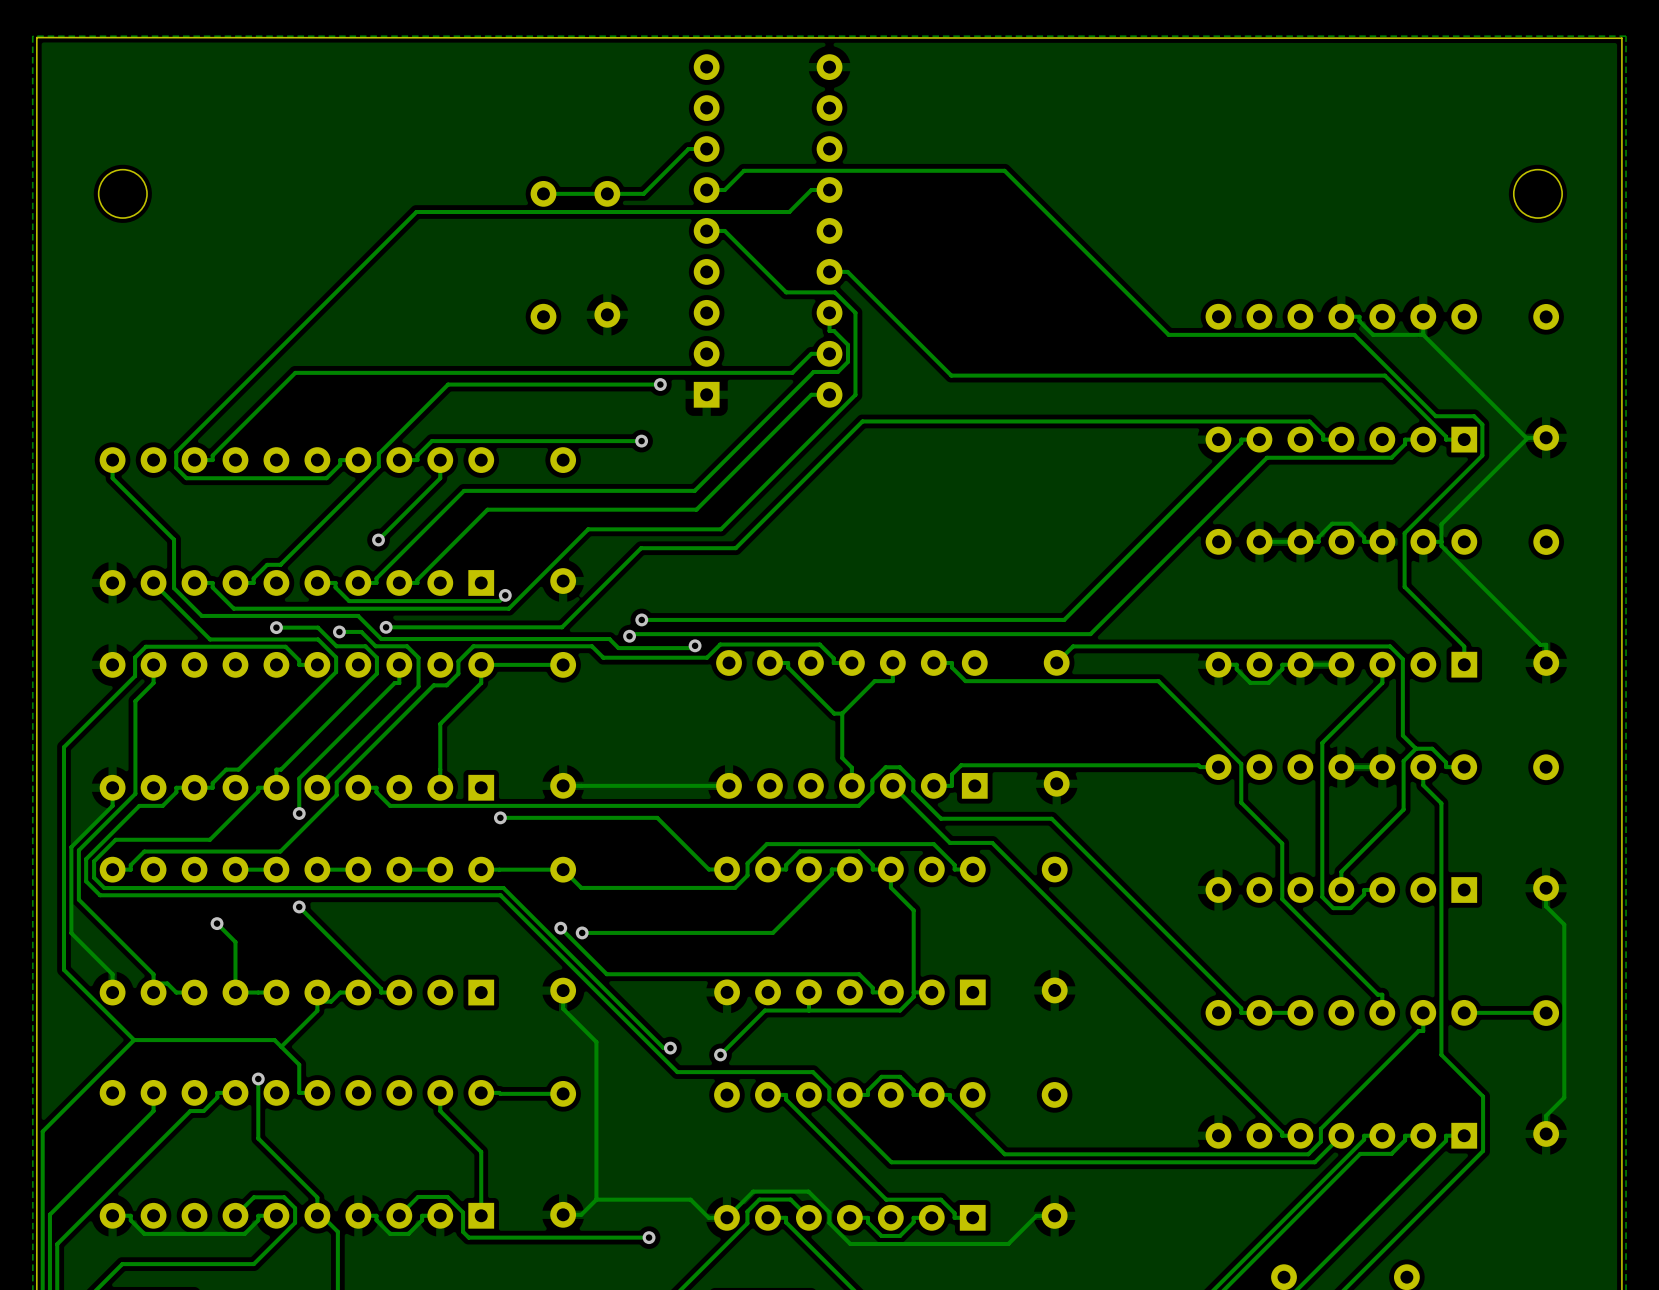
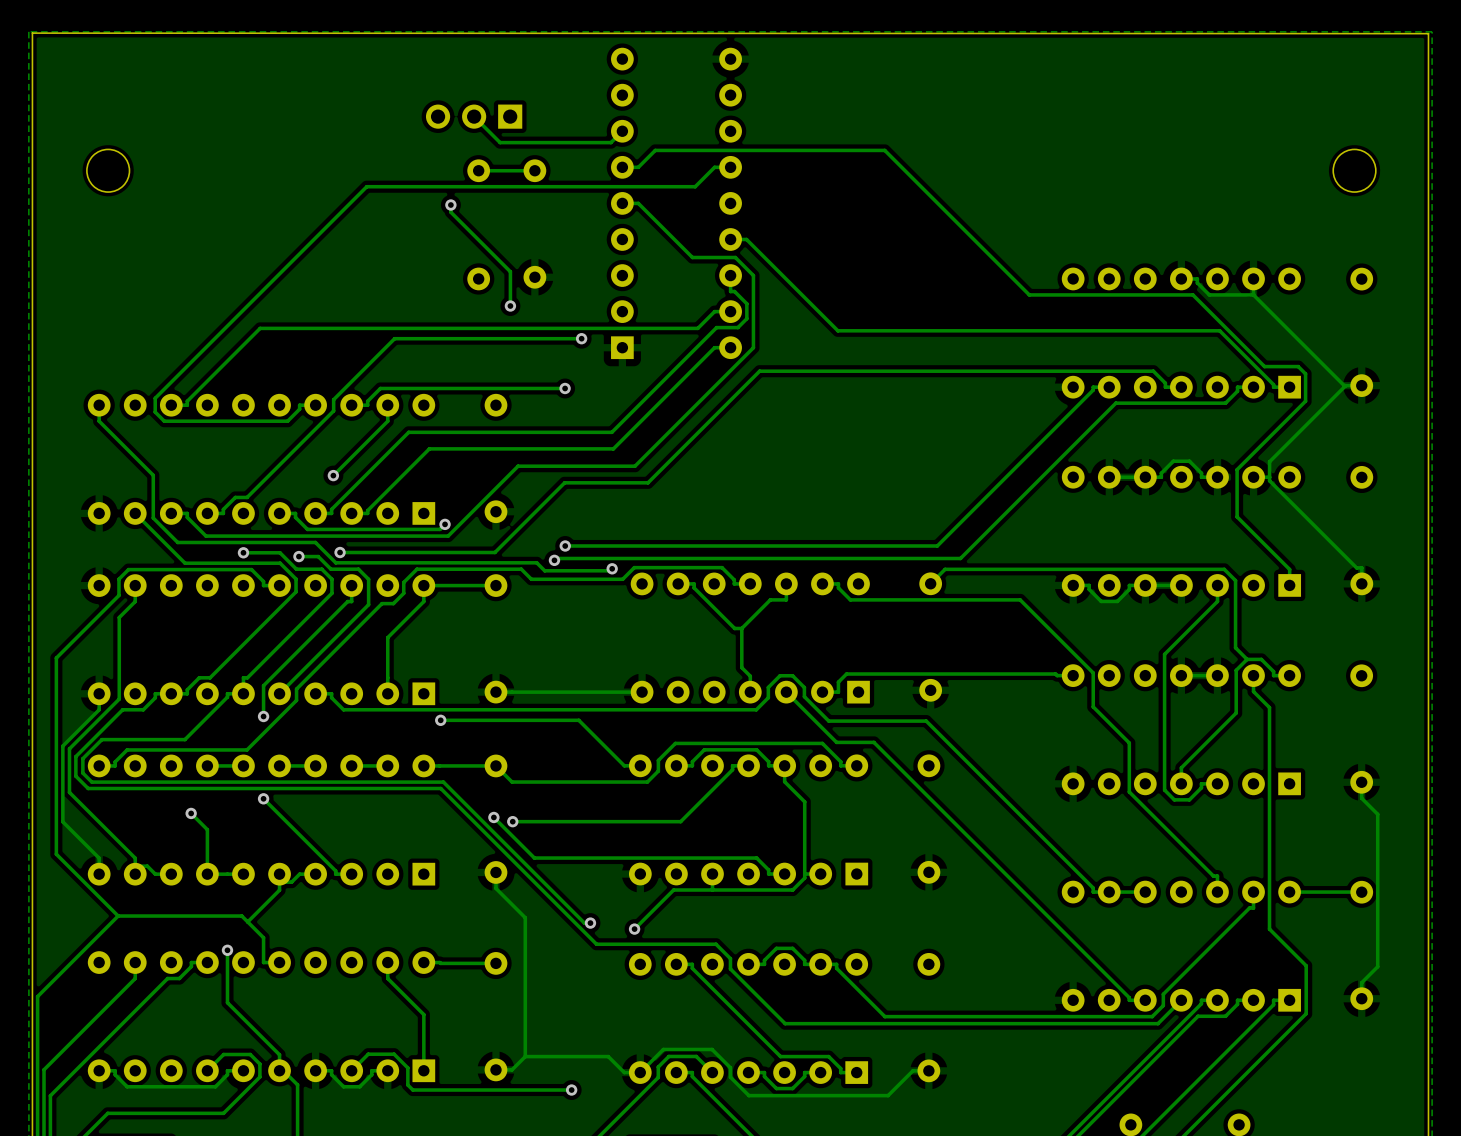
part: none -> (474, 116)
track: (706, 149) (688, 149) (643, 193) (607, 193) -> (622, 131) (611, 142) (500, 142) (474, 116)
track: none -> (450, 205) (450, 212) (510, 271) (510, 306)
via: none -> (450, 205)
via: none -> (510, 306)

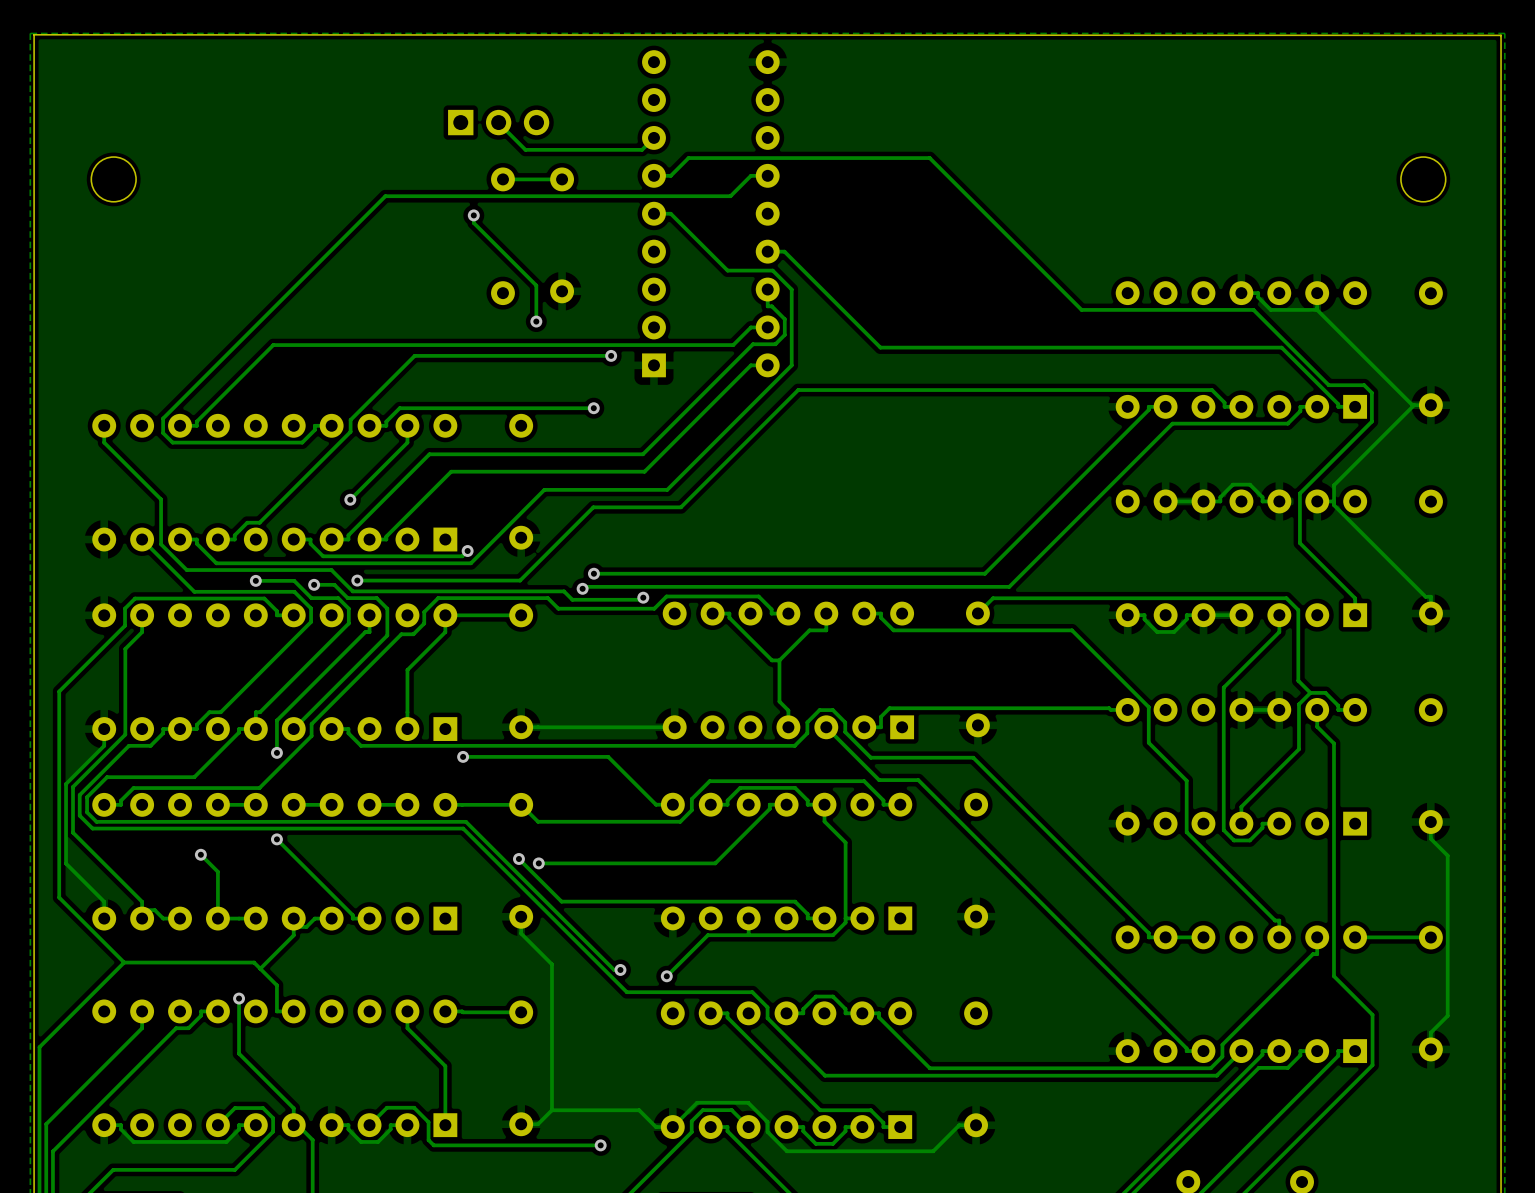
part rotation: 0° (474, 116) -> 180° (498, 122)

